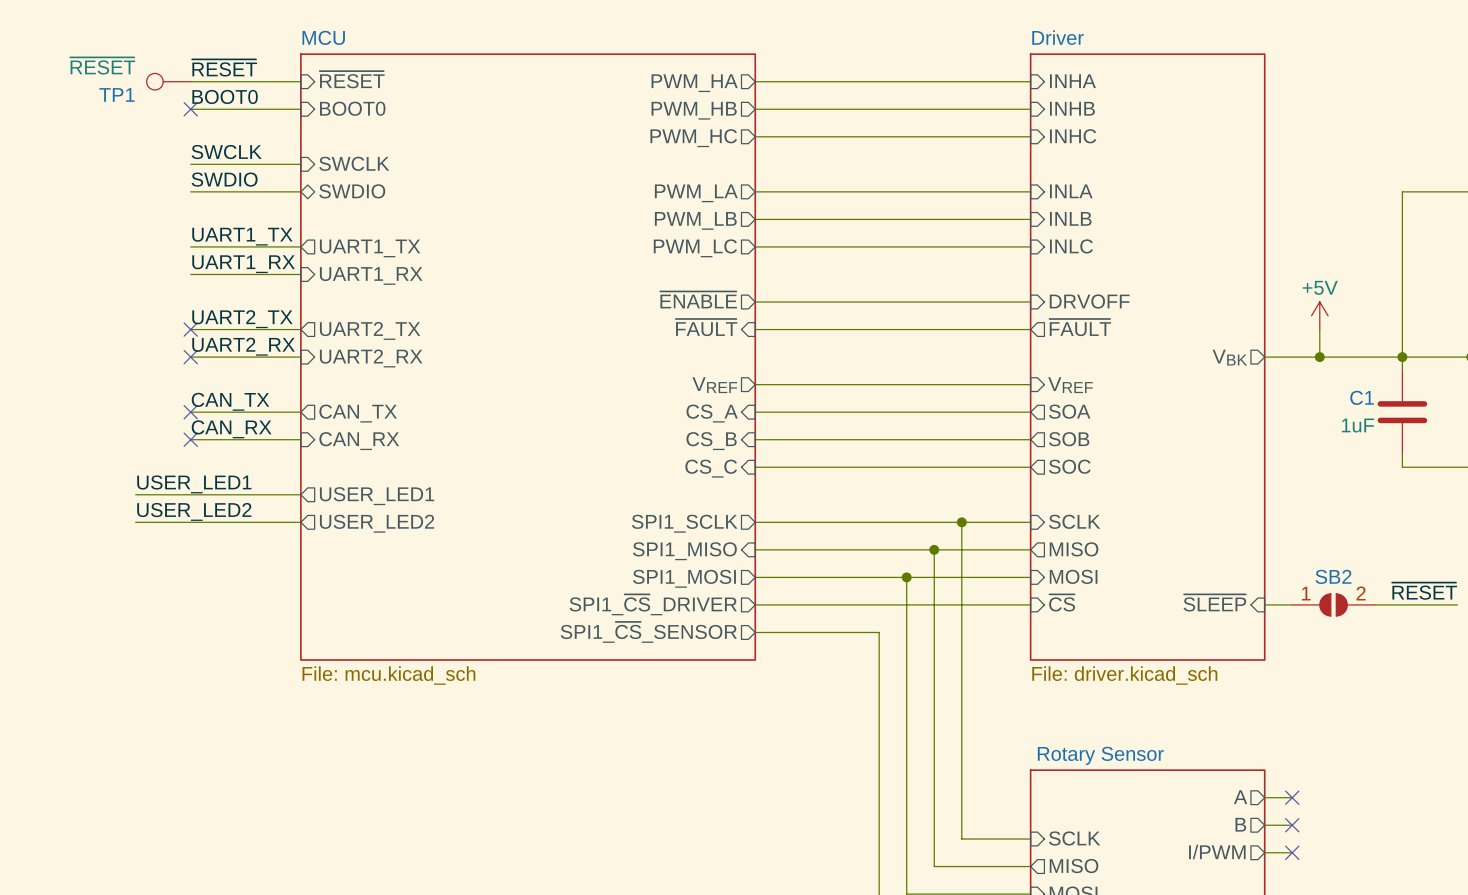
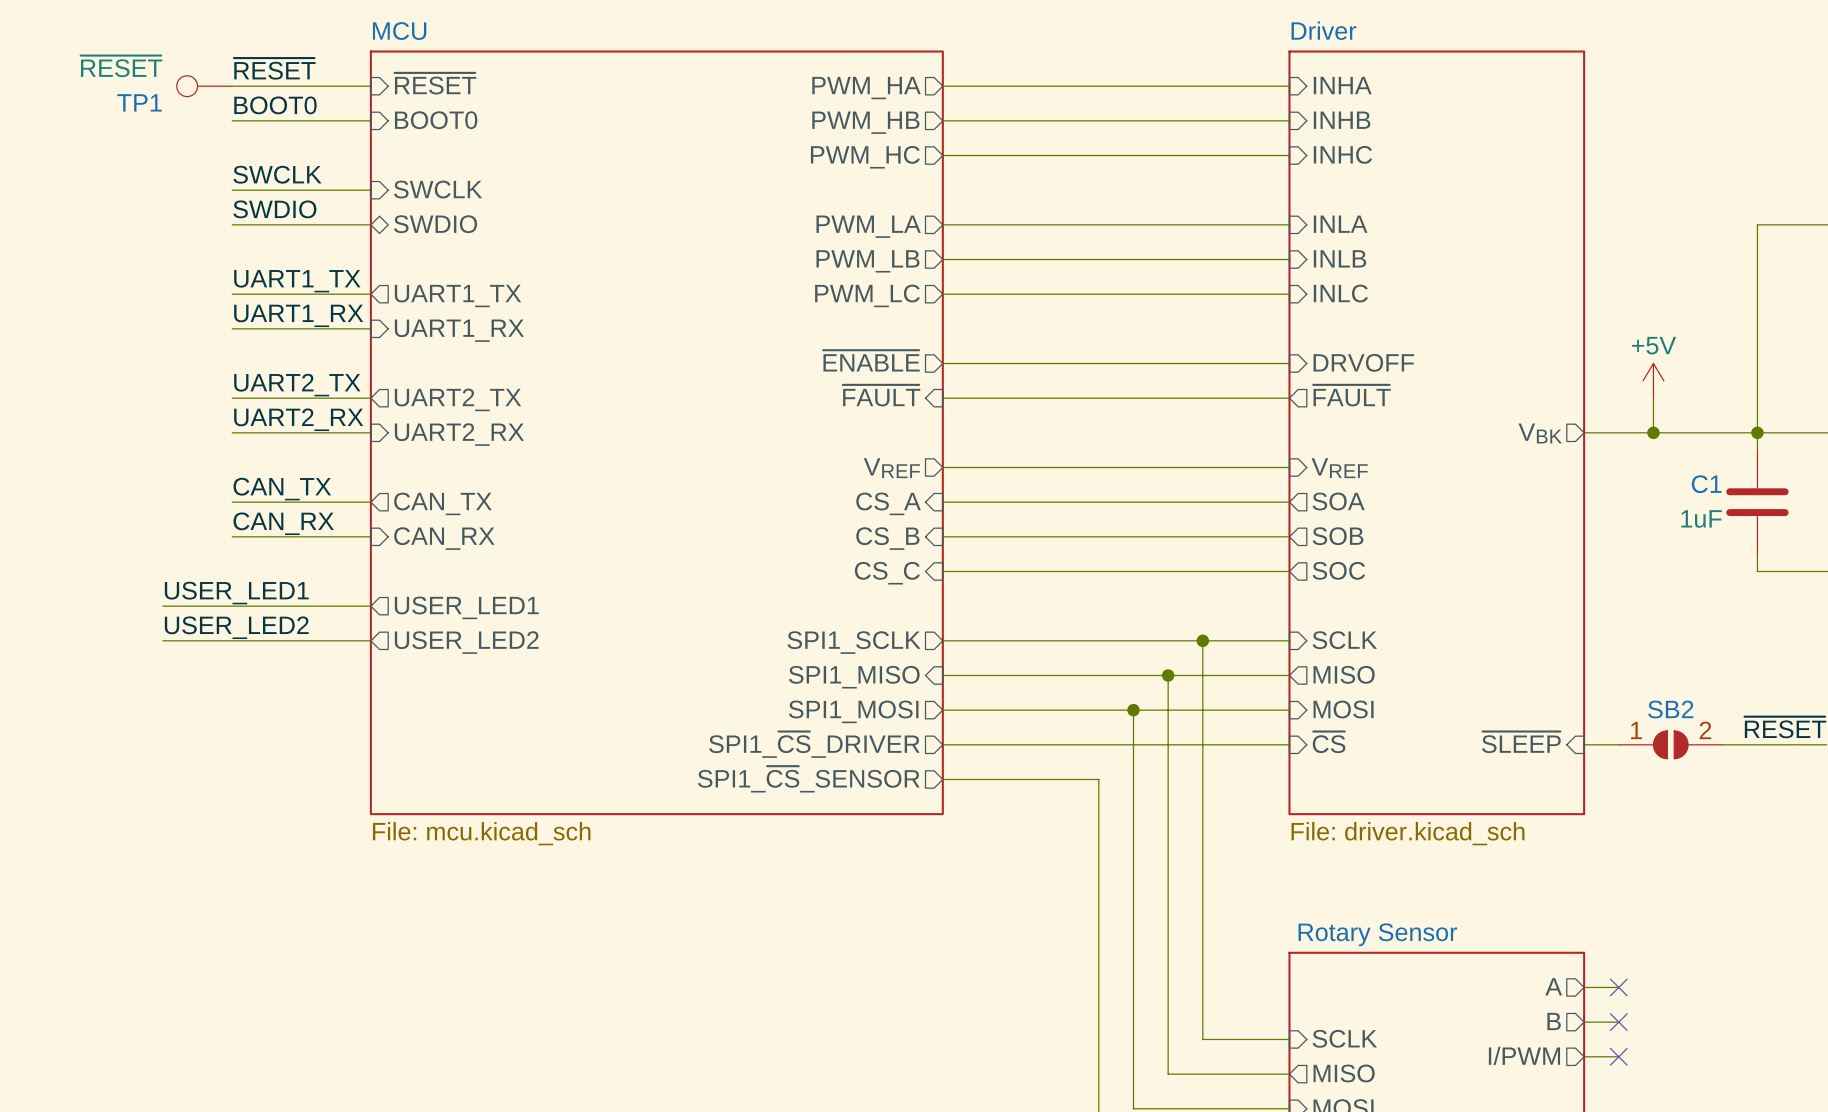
no-connect mark: (190, 109) -> none
no-connect mark: (190, 329) -> none
no-connect mark: (190, 357) -> none
no-connect mark: (190, 412) -> none
no-connect mark: (190, 439) -> none

